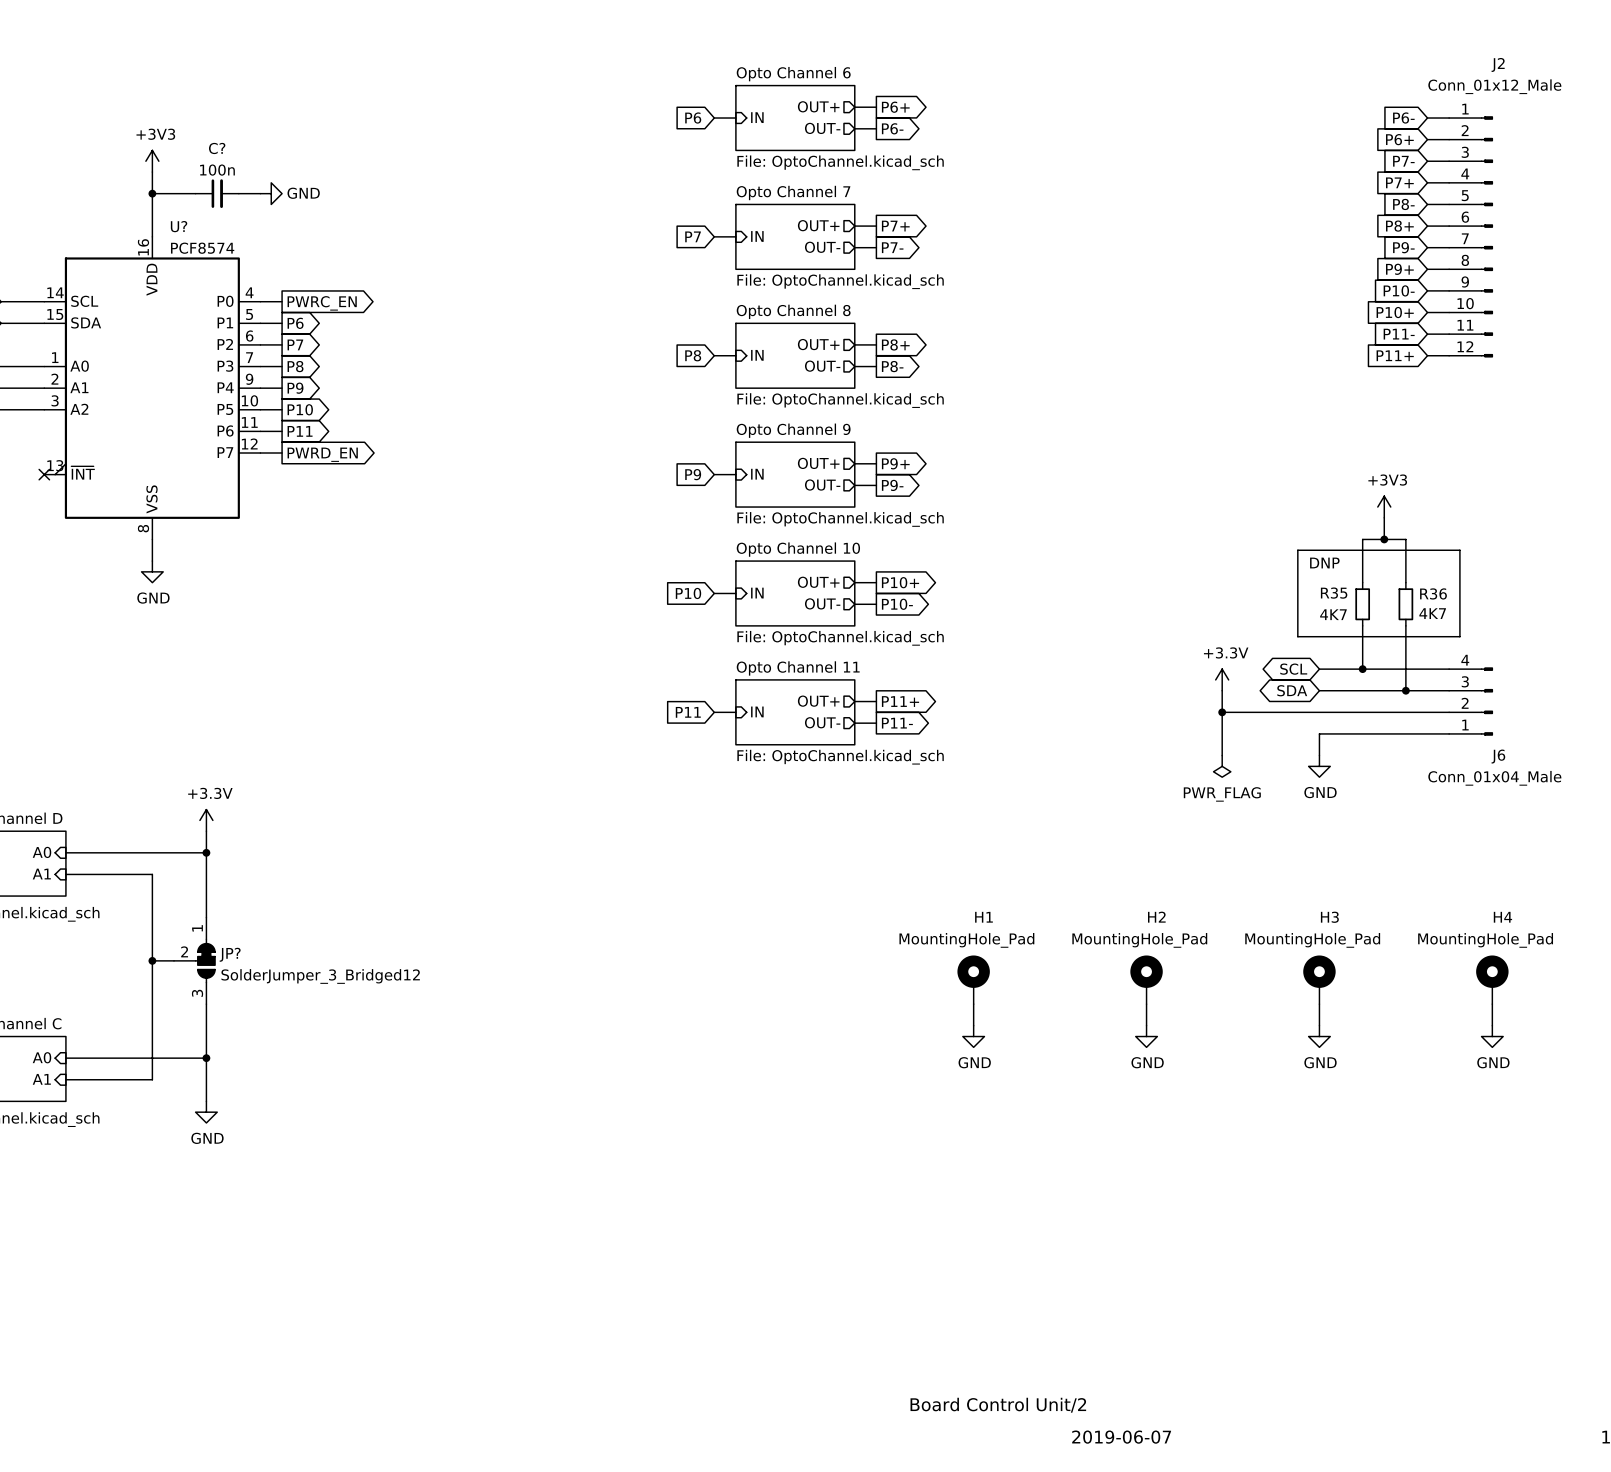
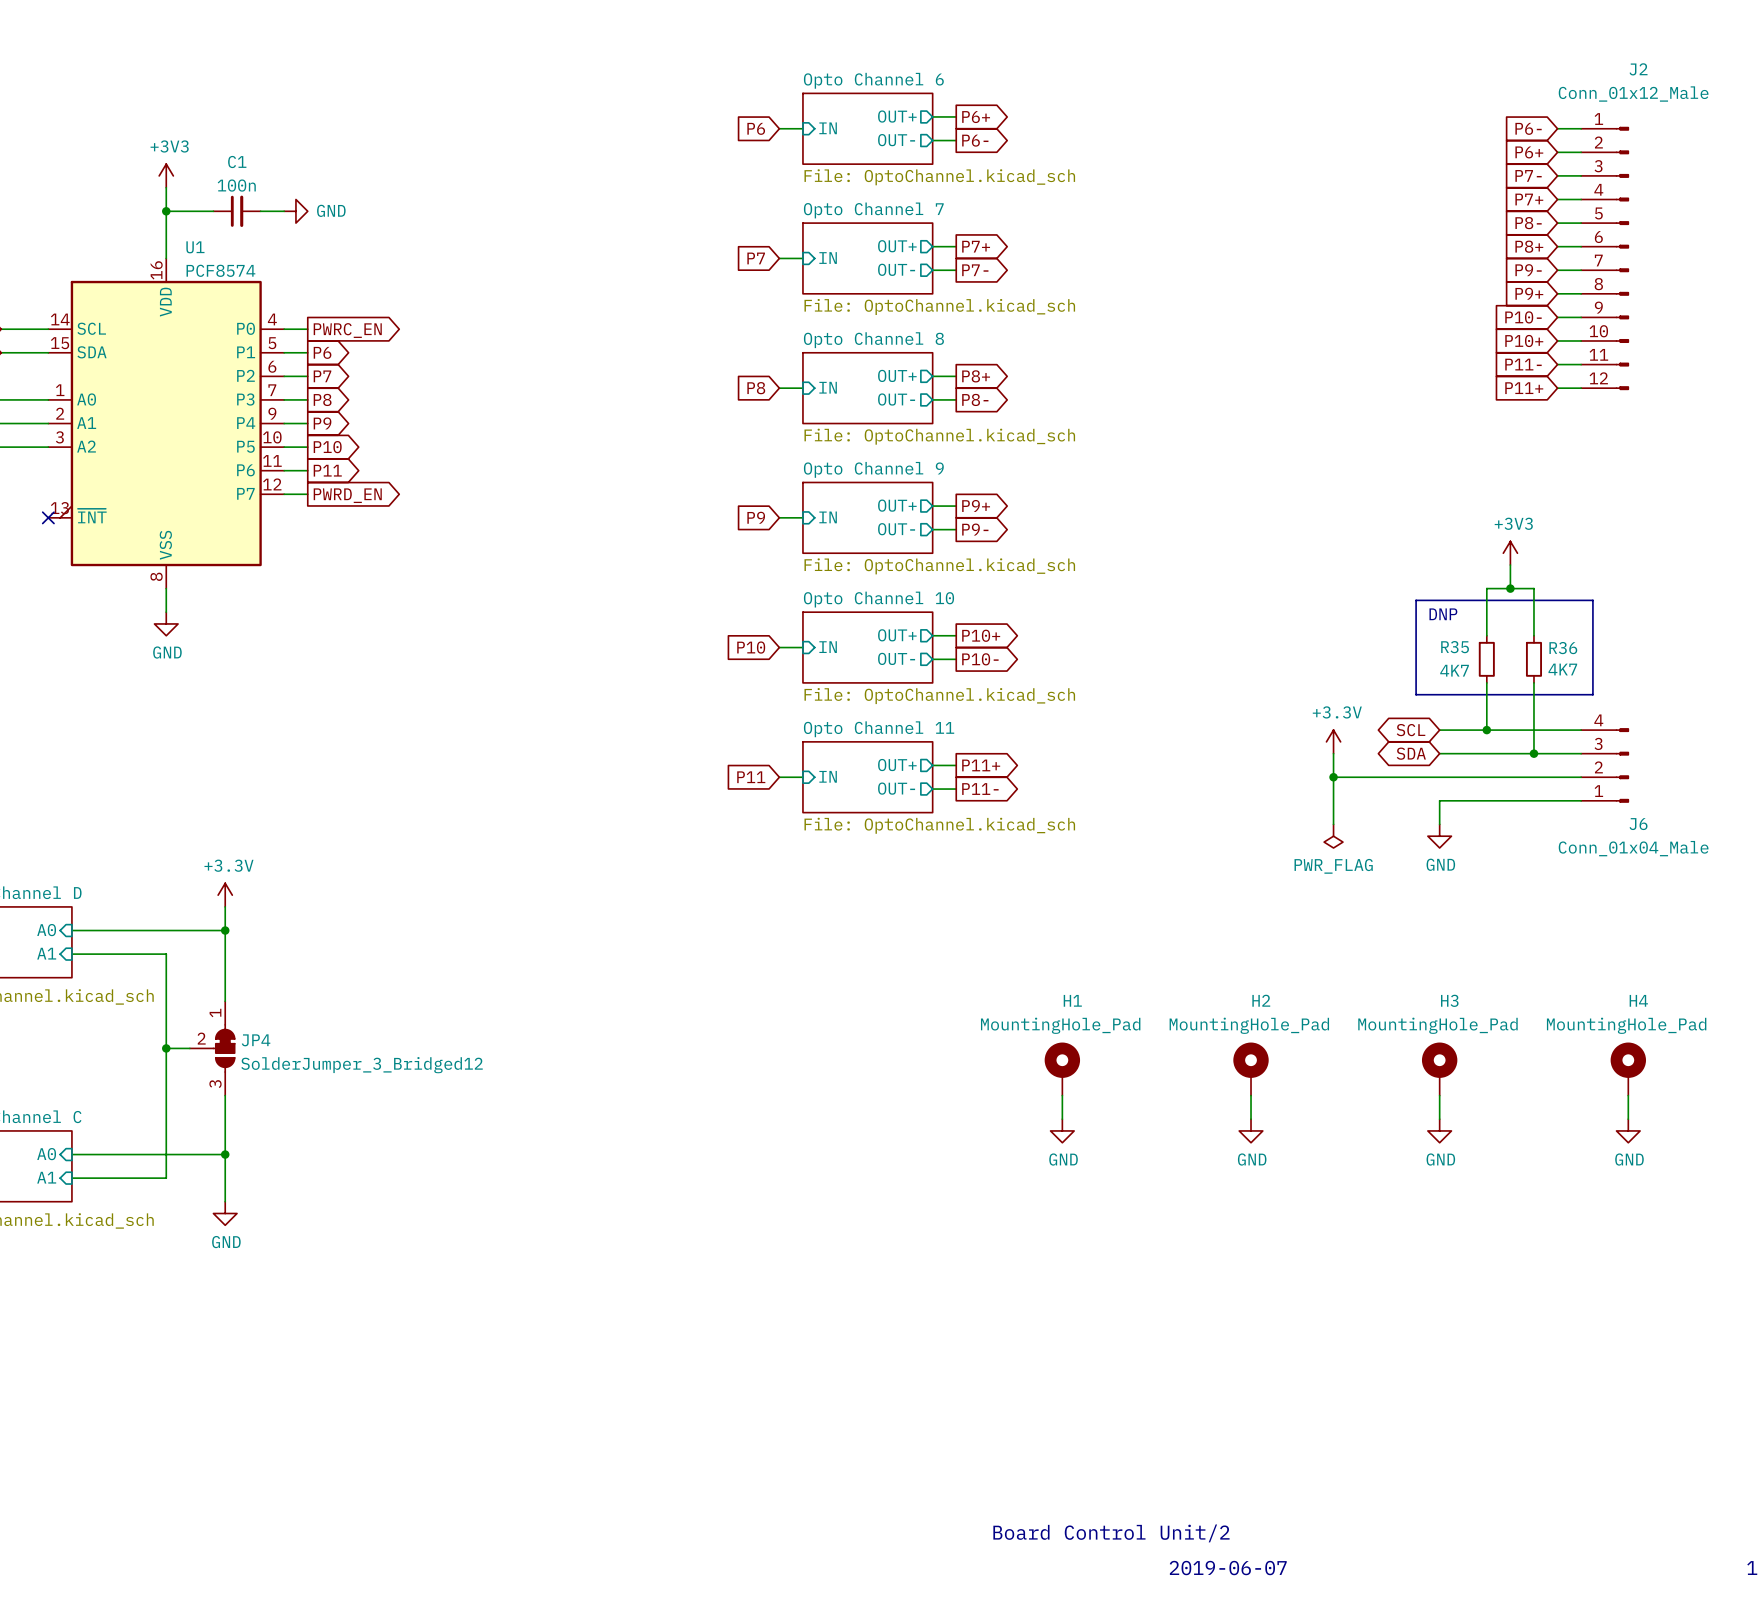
C? name: C? (217, 148) -> C1 (237, 162)
U? name: U? (179, 226) -> U1 (195, 247)
JP? name: JP? (230, 954) -> JP4 (256, 1040)

